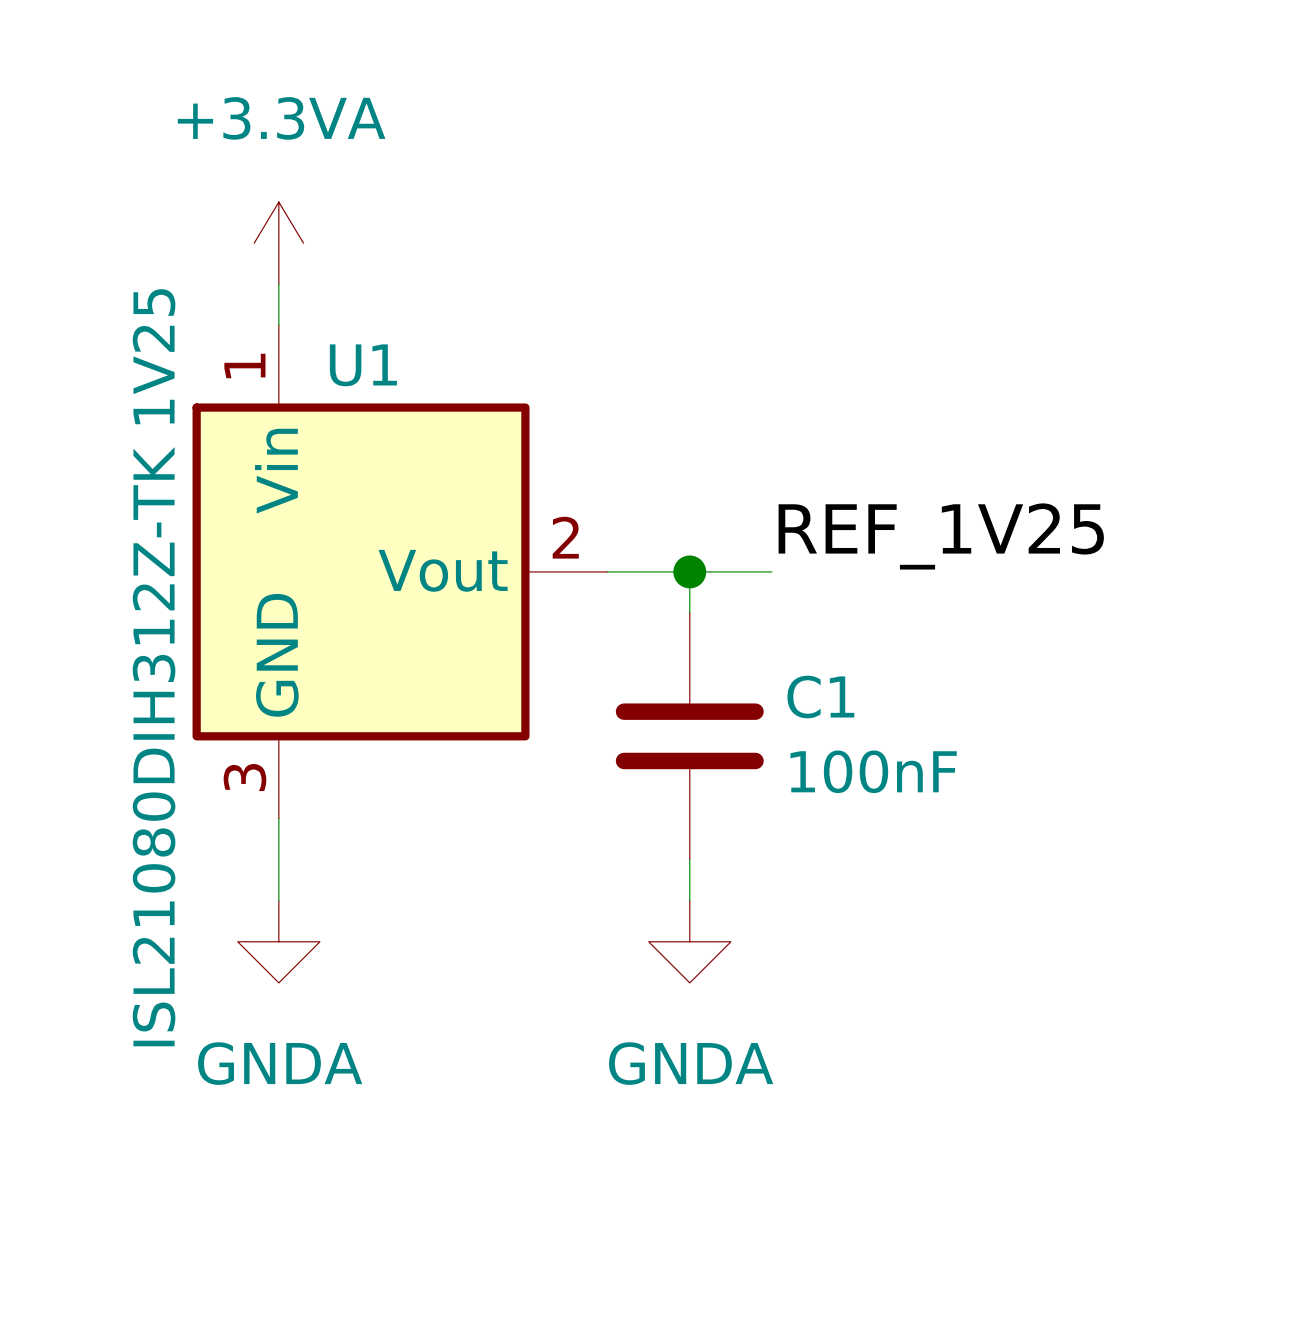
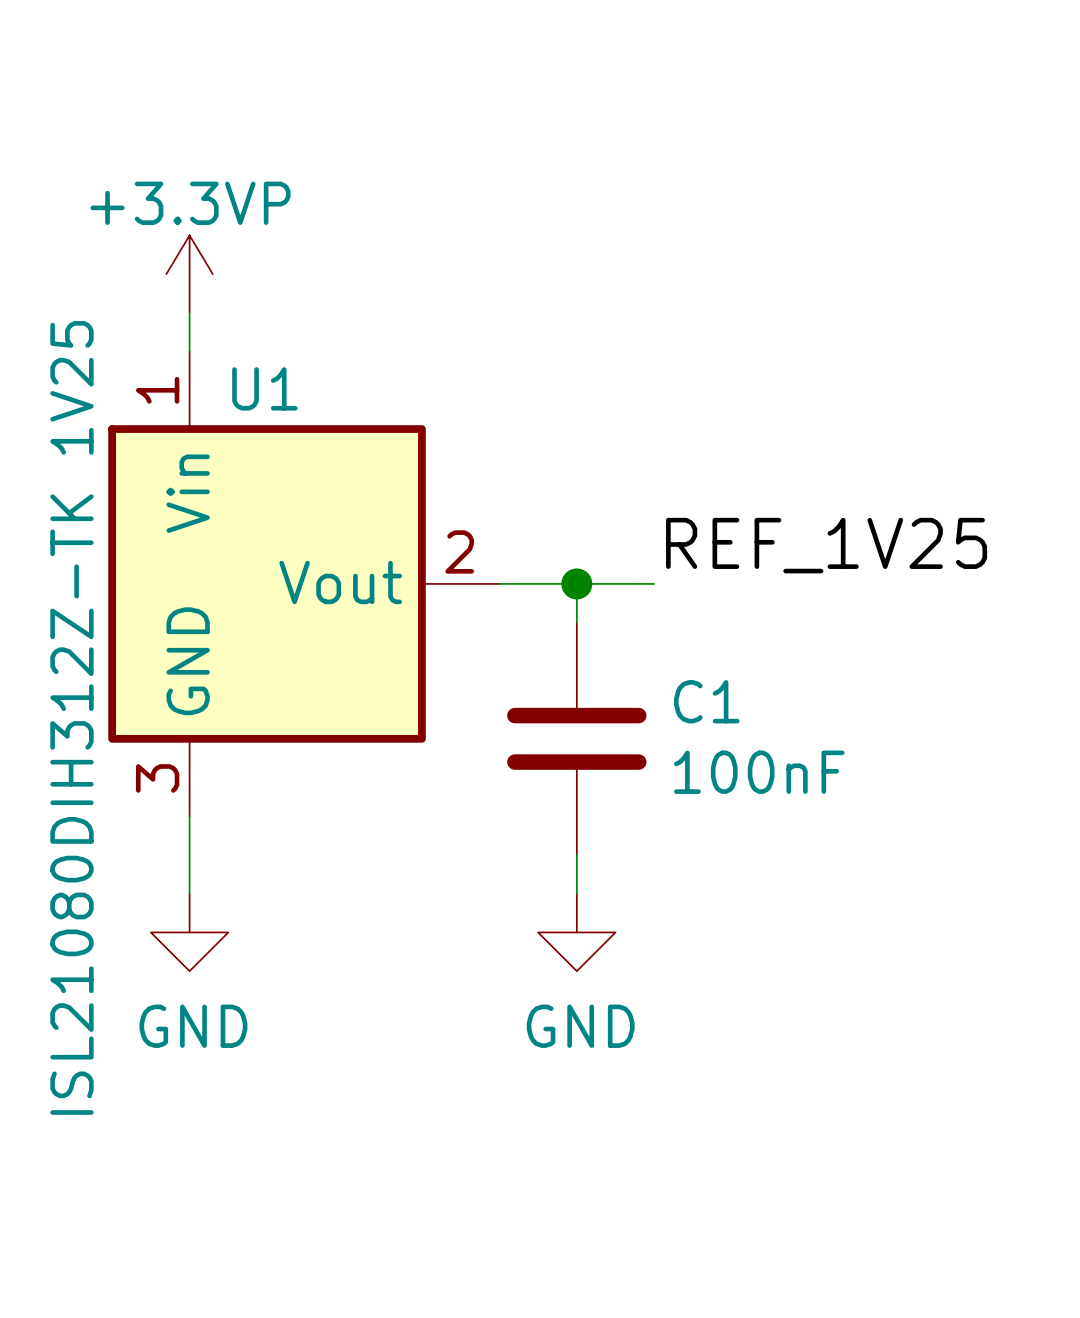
power symbol: +3.3VA (278, 243) -> +3.3VP (189, 274)
power symbol: GNDA (278, 941) -> GND (189, 932)
power symbol: GNDA (689, 941) -> GND (576, 932)

